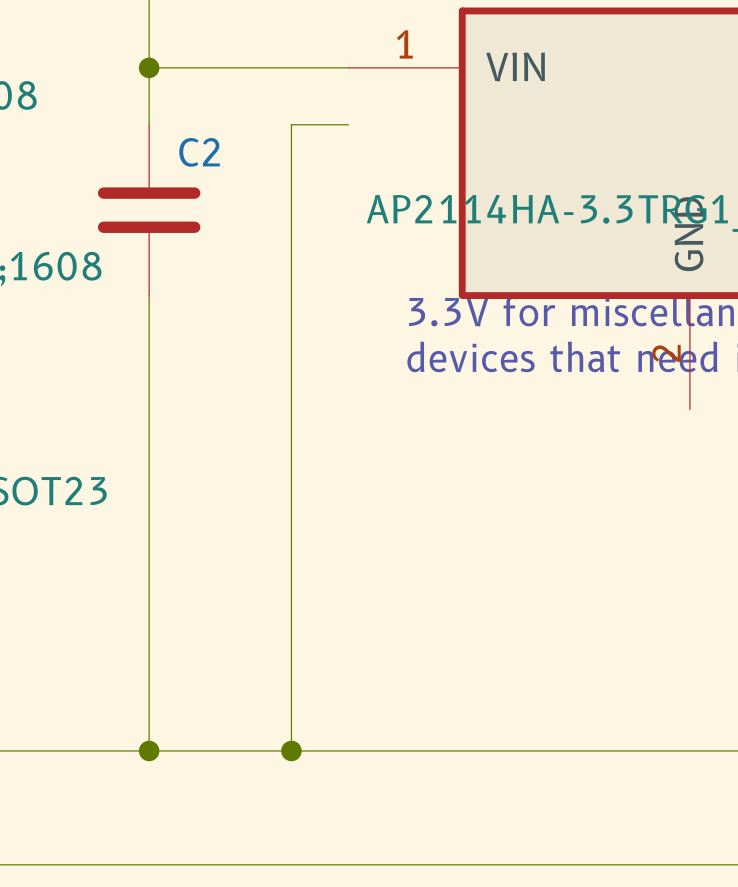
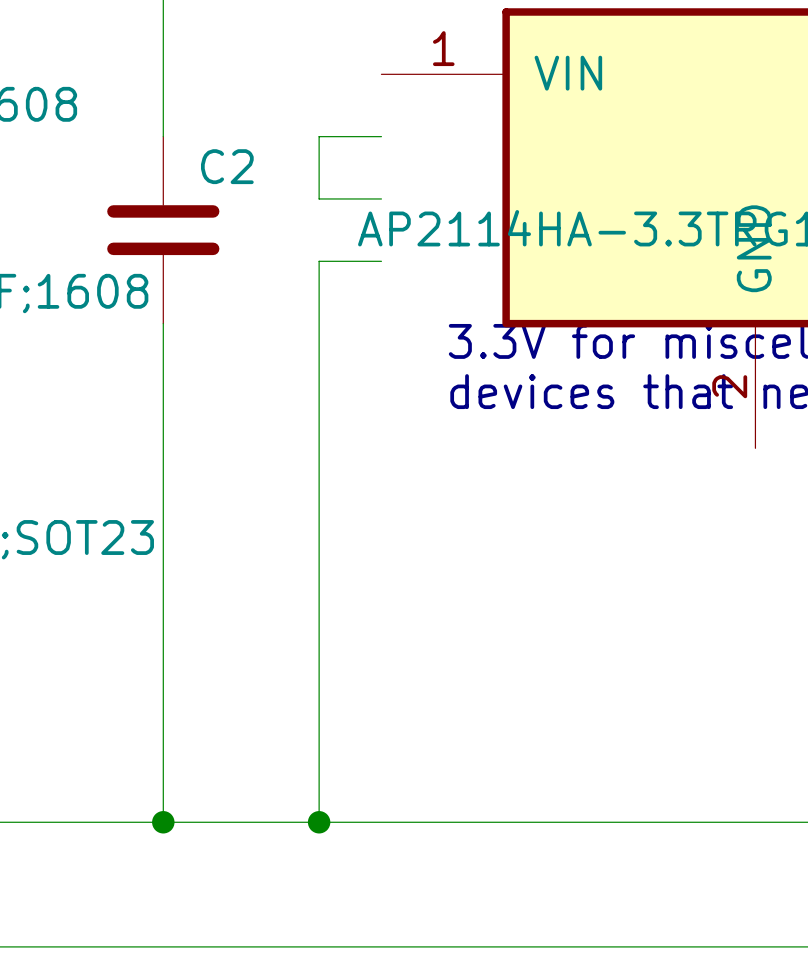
wire: (149, 67) (348, 67) -> none
junction: (149, 67) -> none
wire: (291, 181) (291, 238) -> (319, 198) (381, 198)
wire: none -> (319, 261) (381, 261)

